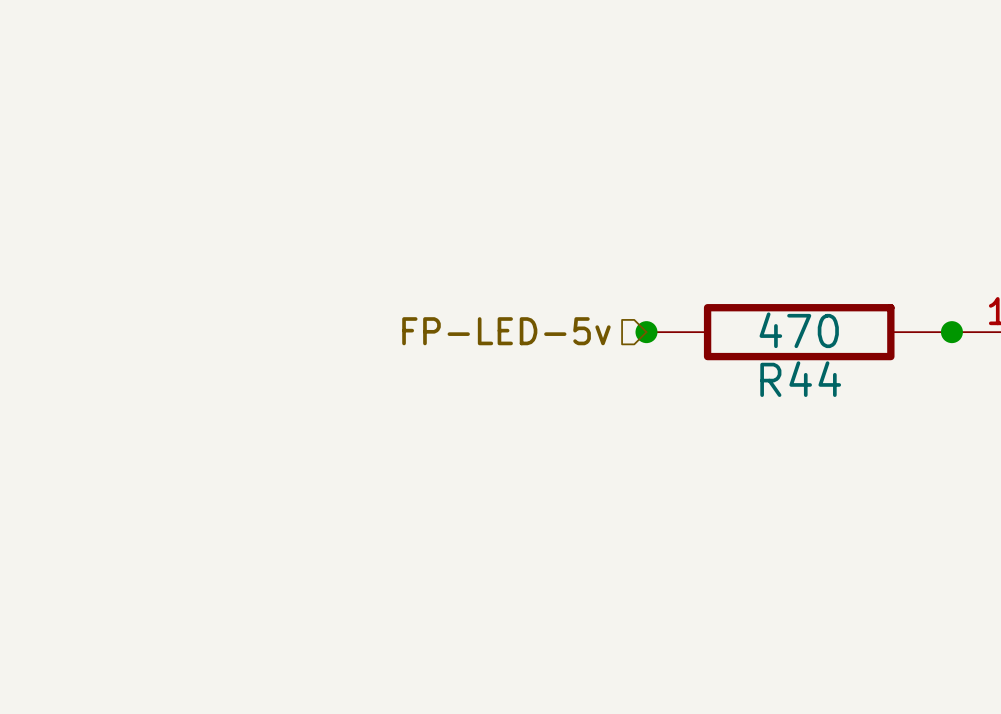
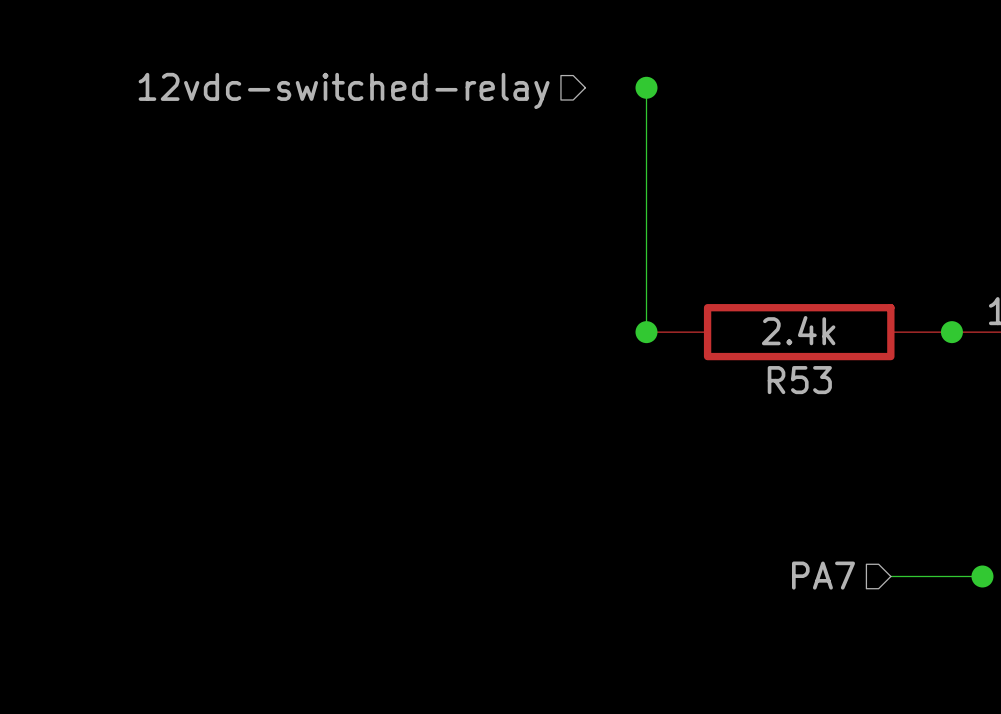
wire: none -> (646, 87) (646, 332)
junction: none -> (646, 87)
hierarchical label: none -> 12vdc-switched-relay (344, 90)
R44 value: 470 (799, 330) -> 2.4k (798, 330)
hierarchical label: FP-LED-5v (506, 331) -> none
R44 name: R44 (800, 379) -> R53 (799, 380)
hierarchical label: none -> PA7 (823, 575)
wire: none -> (890, 576) (982, 576)
junction: none -> (982, 576)

